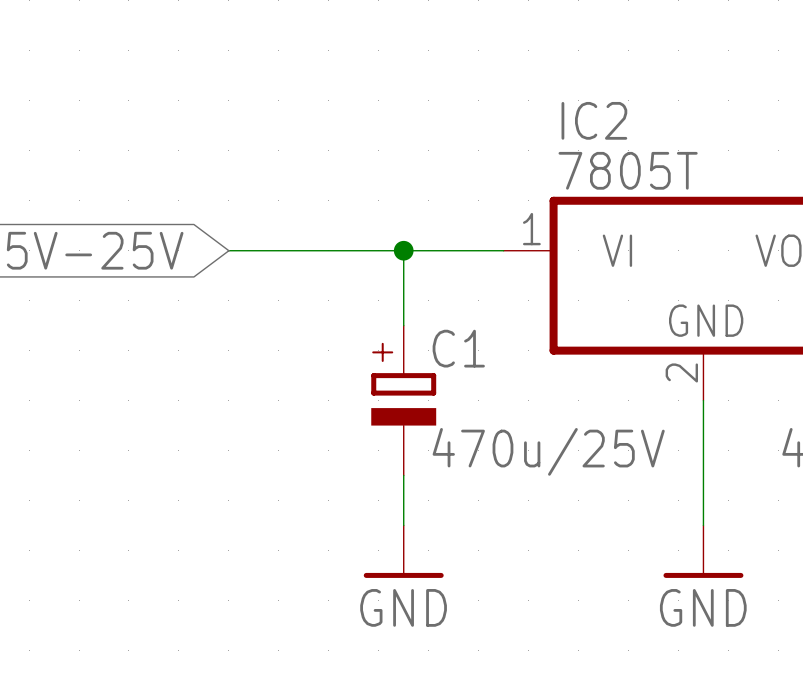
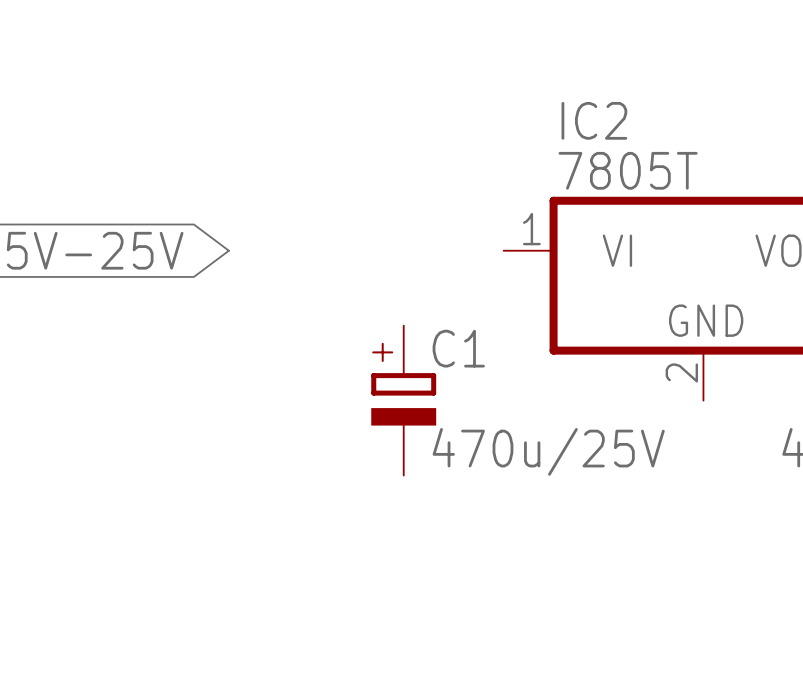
wire: (228, 250) (503, 250) -> none
wire: (403, 250) (403, 325) -> none
junction: (403, 250) -> none
wire: (703, 400) (703, 525) -> none
wire: (403, 475) (403, 525) -> none
power symbol: GND (403, 551) -> none
power symbol: GND (703, 551) -> none

